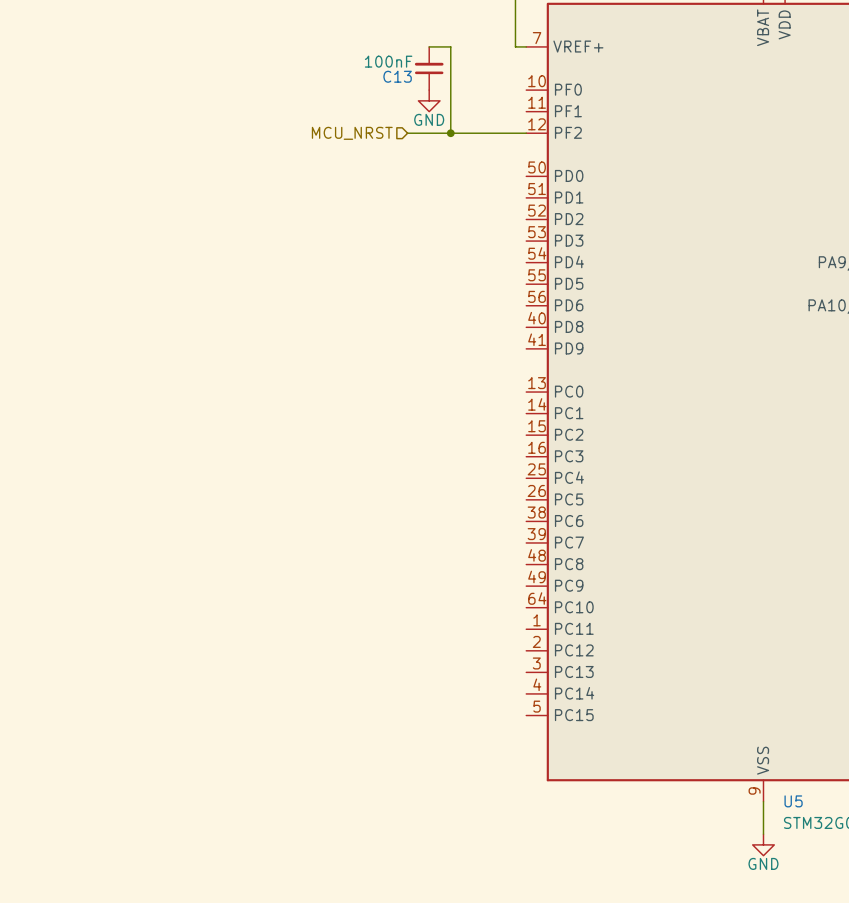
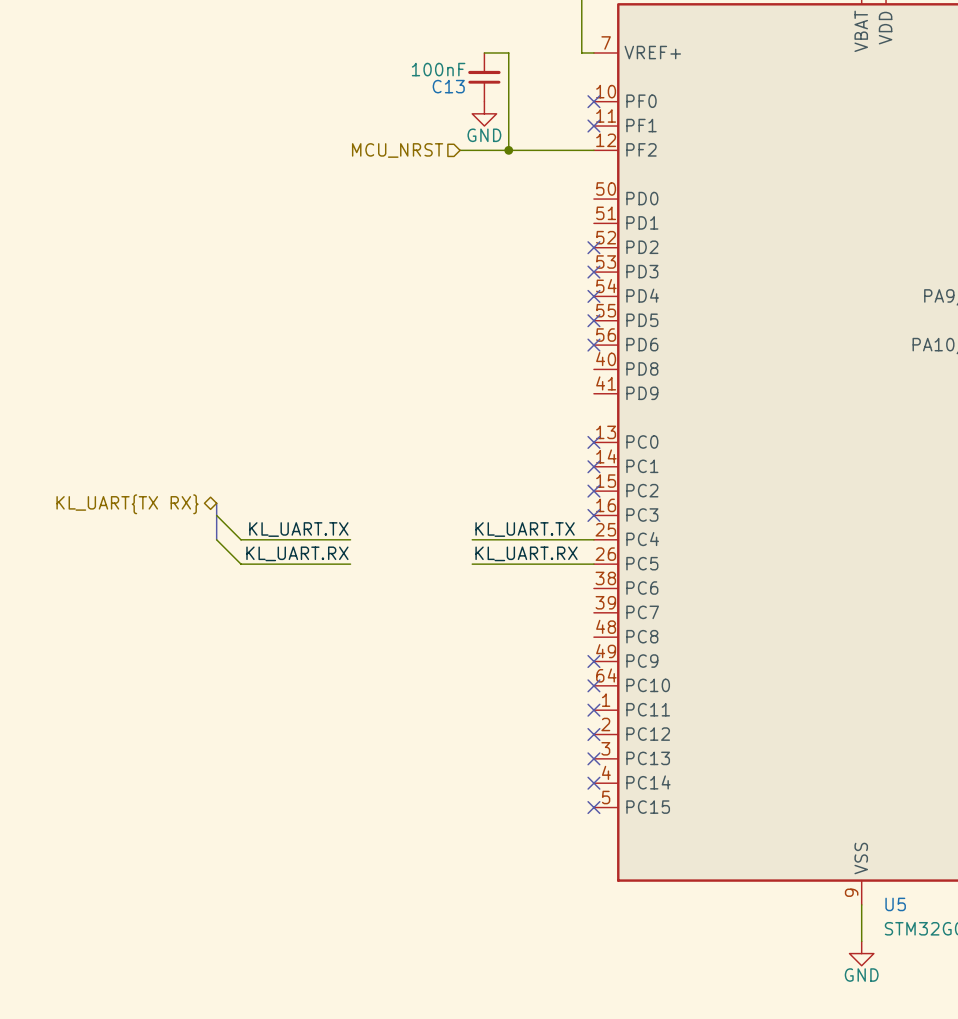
no-connect mark: none -> (593, 101)
no-connect mark: none -> (593, 126)
no-connect mark: none -> (593, 247)
no-connect mark: none -> (593, 272)
no-connect mark: none -> (593, 296)
no-connect mark: none -> (593, 320)
no-connect mark: none -> (593, 345)
no-connect mark: none -> (593, 442)
no-connect mark: none -> (593, 466)
no-connect mark: none -> (593, 491)
bus: none -> (216, 503) (216, 539)
hierarchical label: none -> KL_UART{TX RX} (127, 504)
wire: none -> (216, 515) (241, 539) (350, 539)
no-connect mark: none -> (593, 515)
label: none -> KL_UART.TX (298, 529)
label: none -> KL_UART.TX (525, 529)
wire: none -> (216, 539) (241, 564) (350, 564)
wire: none -> (472, 539) (593, 539)
label: none -> KL_UART.RX (297, 553)
label: none -> KL_UART.RX (526, 553)
wire: none -> (472, 564) (593, 564)
no-connect mark: none -> (593, 661)
no-connect mark: none -> (593, 685)
no-connect mark: none -> (593, 710)
no-connect mark: none -> (593, 734)
no-connect mark: none -> (593, 758)
no-connect mark: none -> (593, 783)
no-connect mark: none -> (593, 807)

